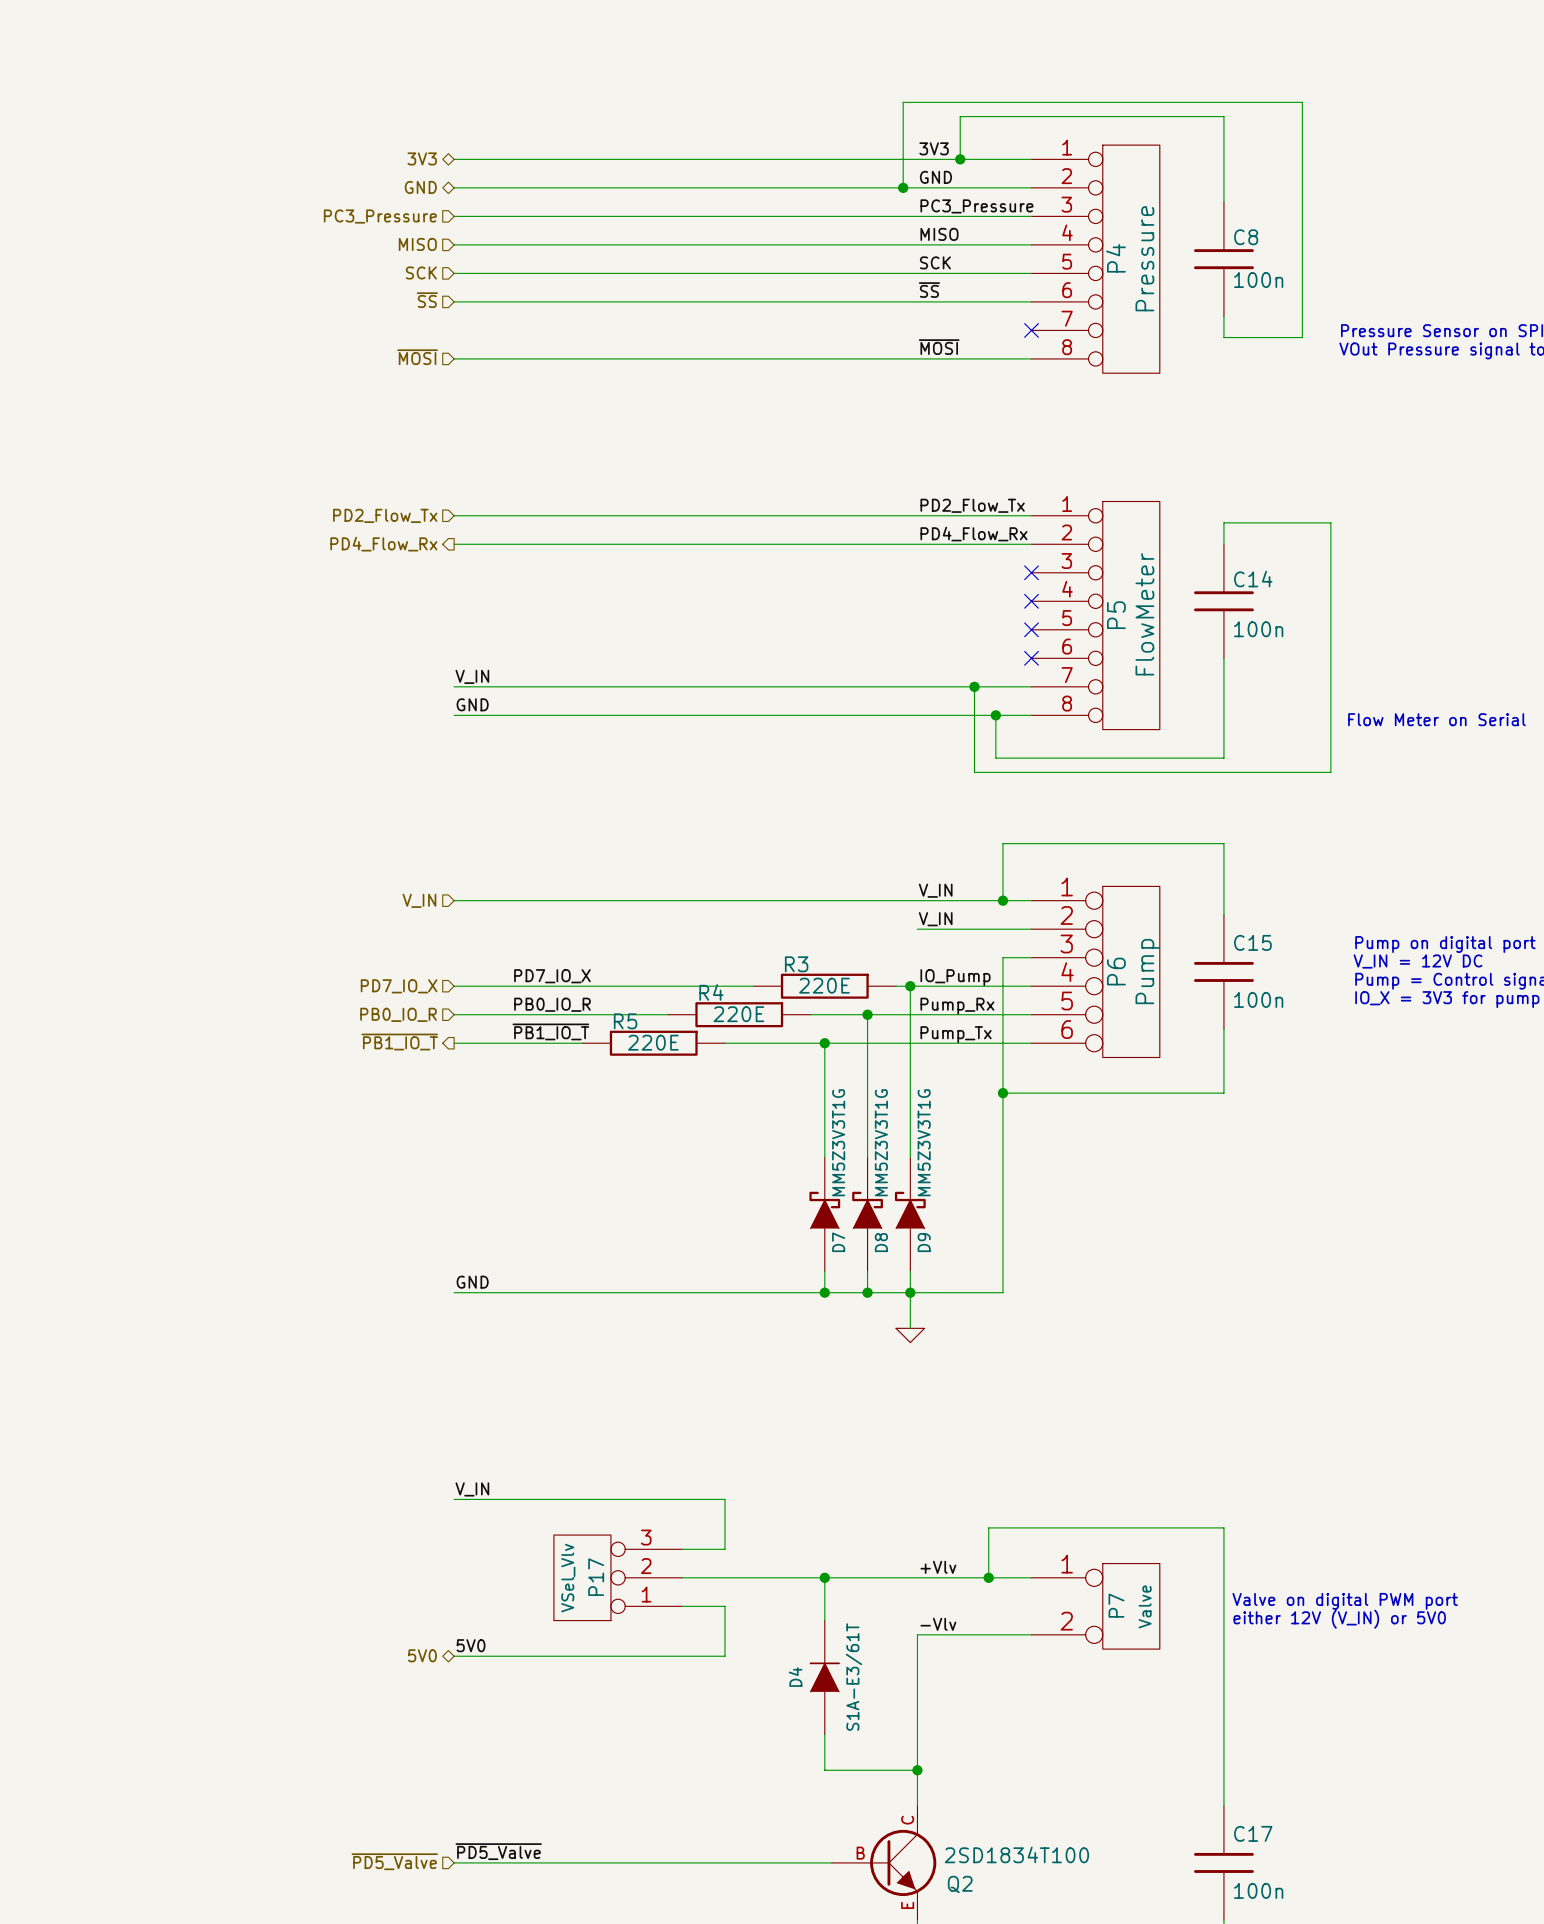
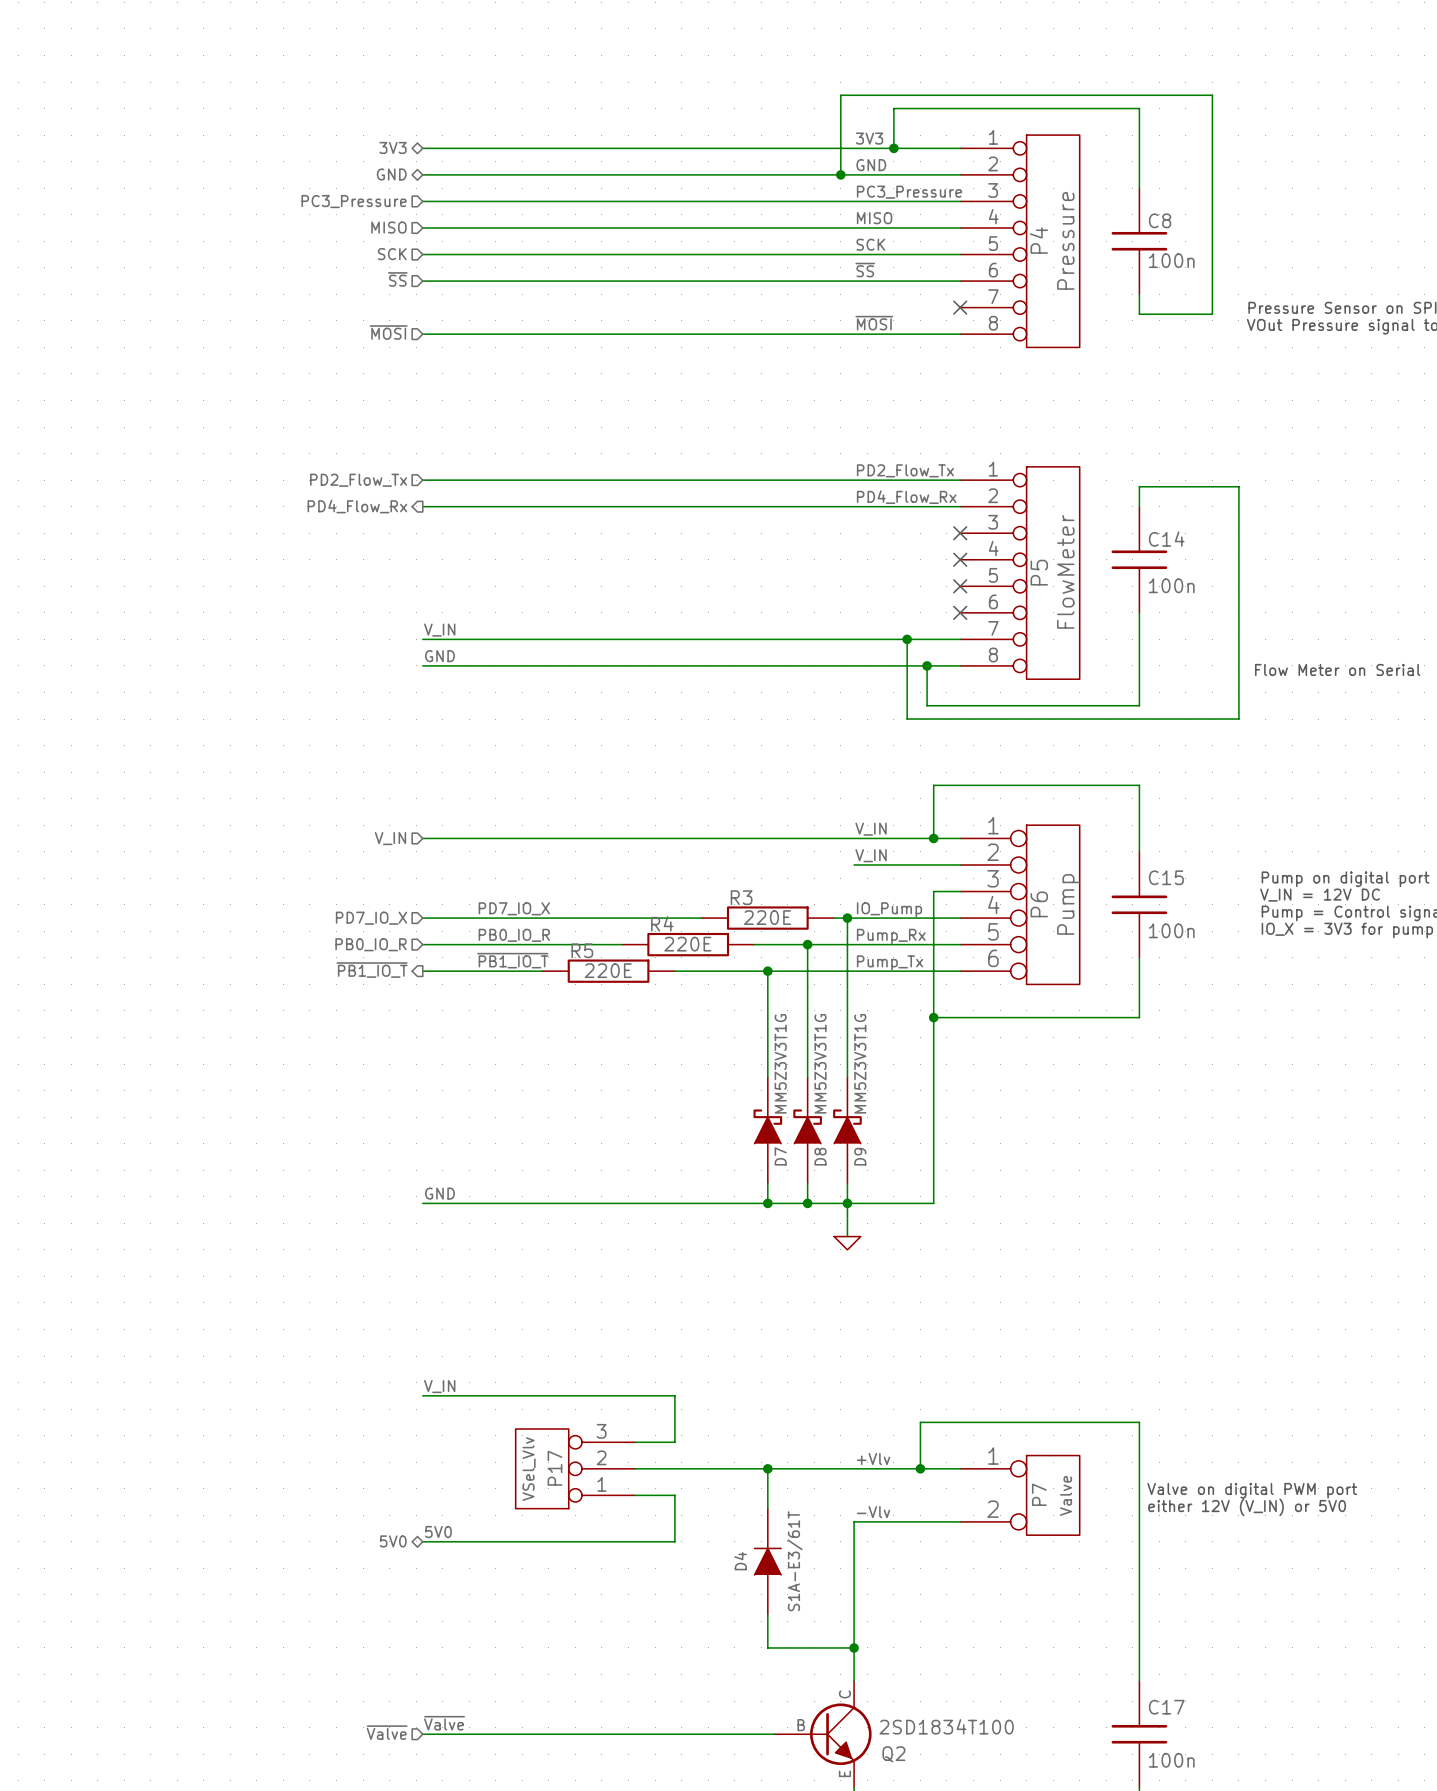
label: ~{PD5_Valve} (498, 1851) -> ~{Valve} (444, 1723)
hierarchical label: ~{PD5_Valve} (394, 1861) -> ~{Valve} (387, 1732)

